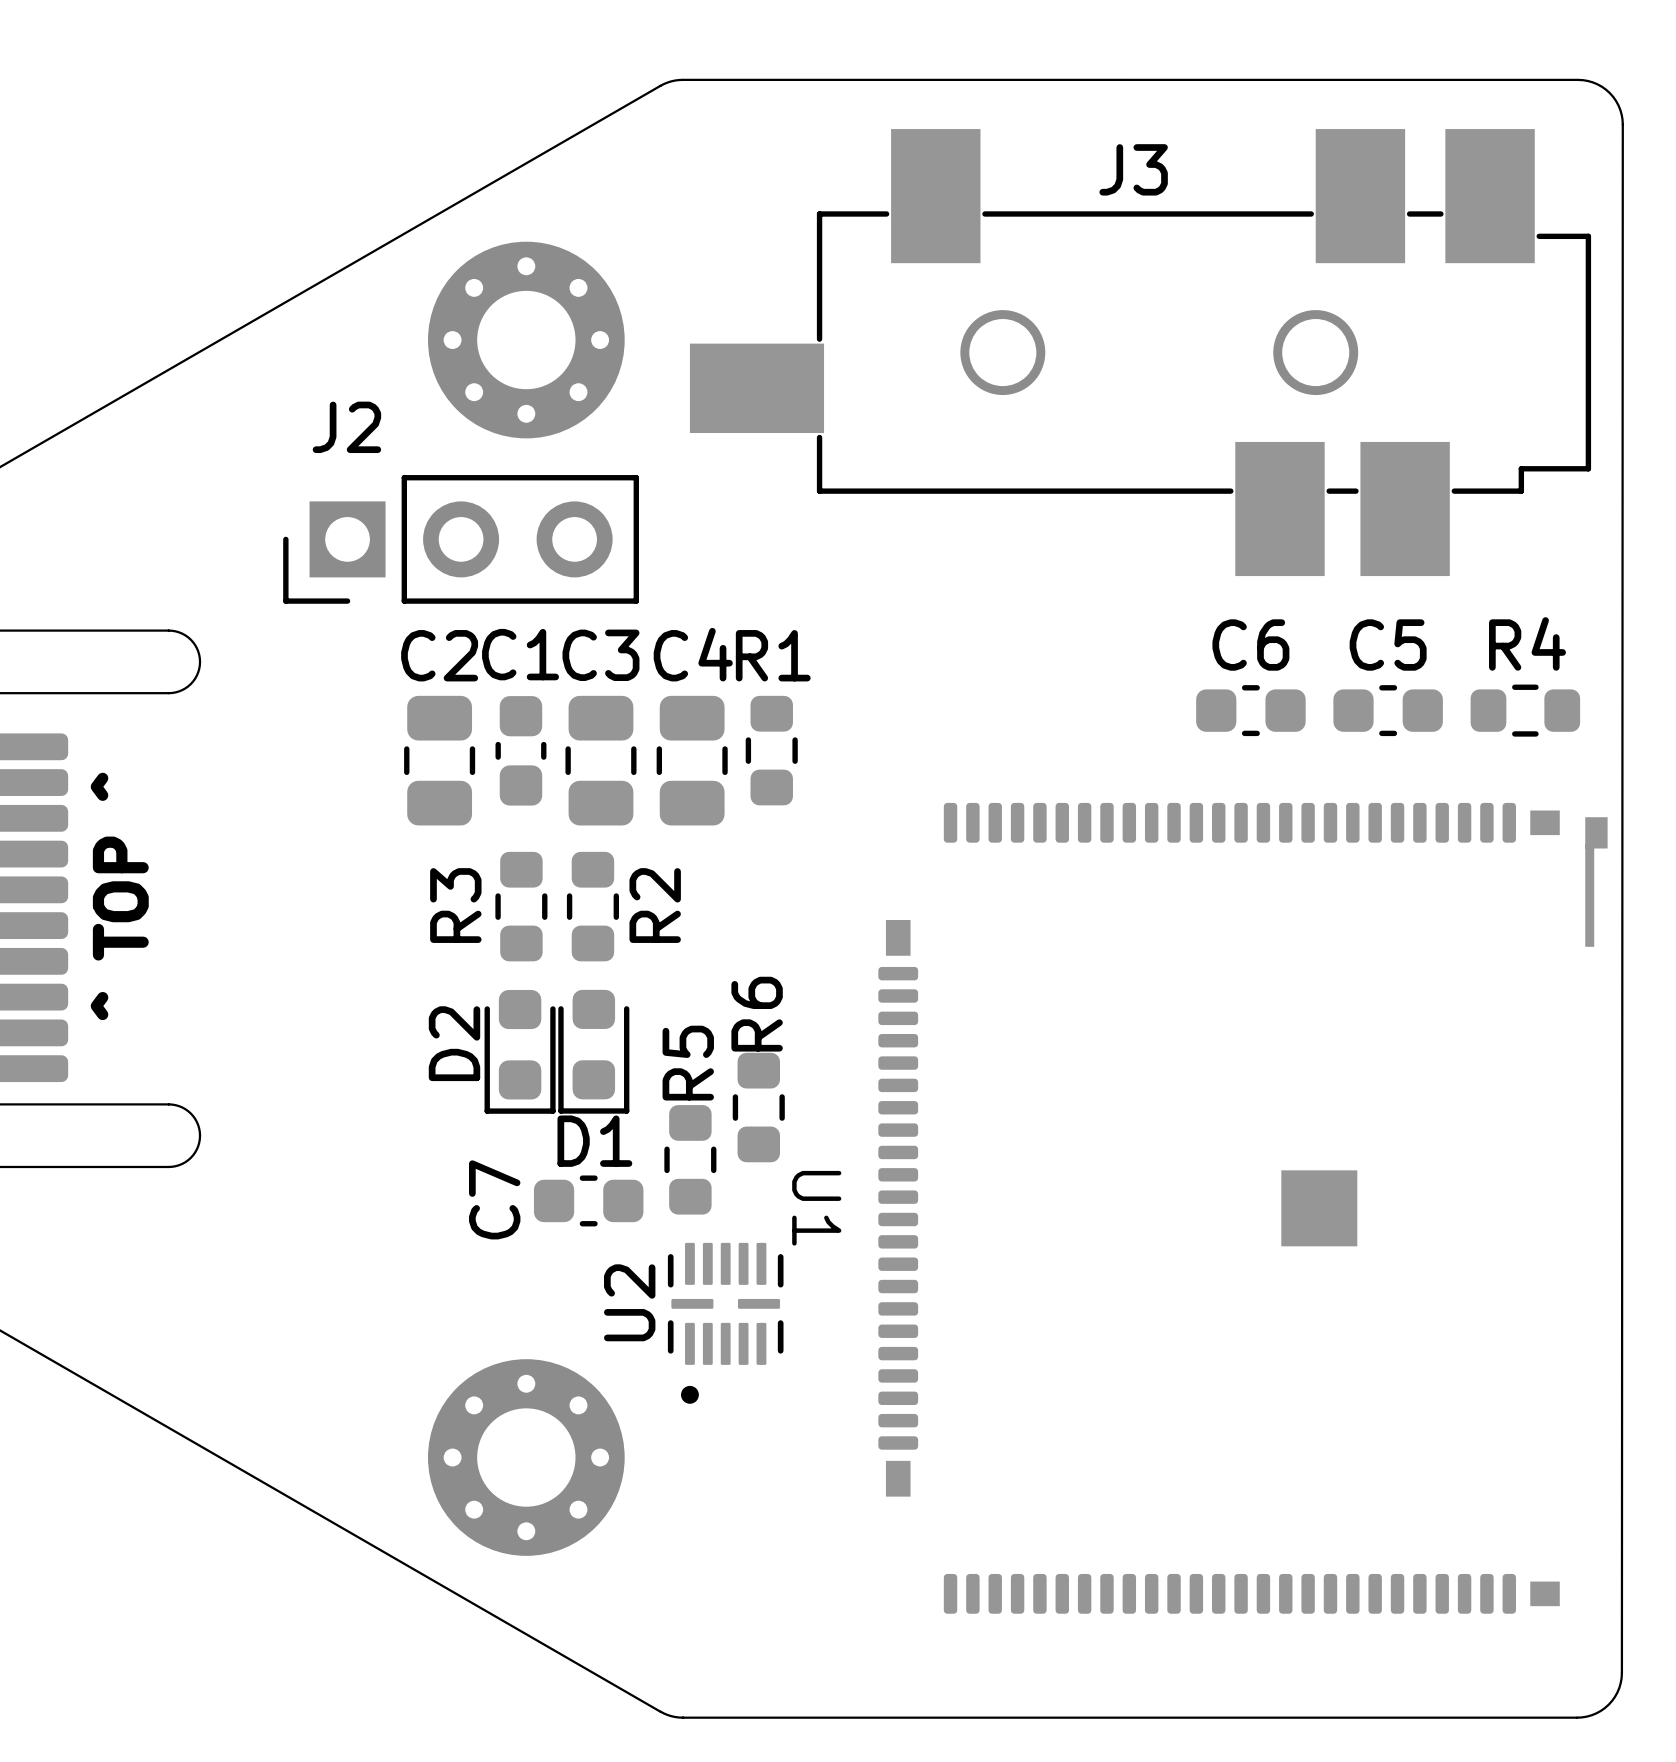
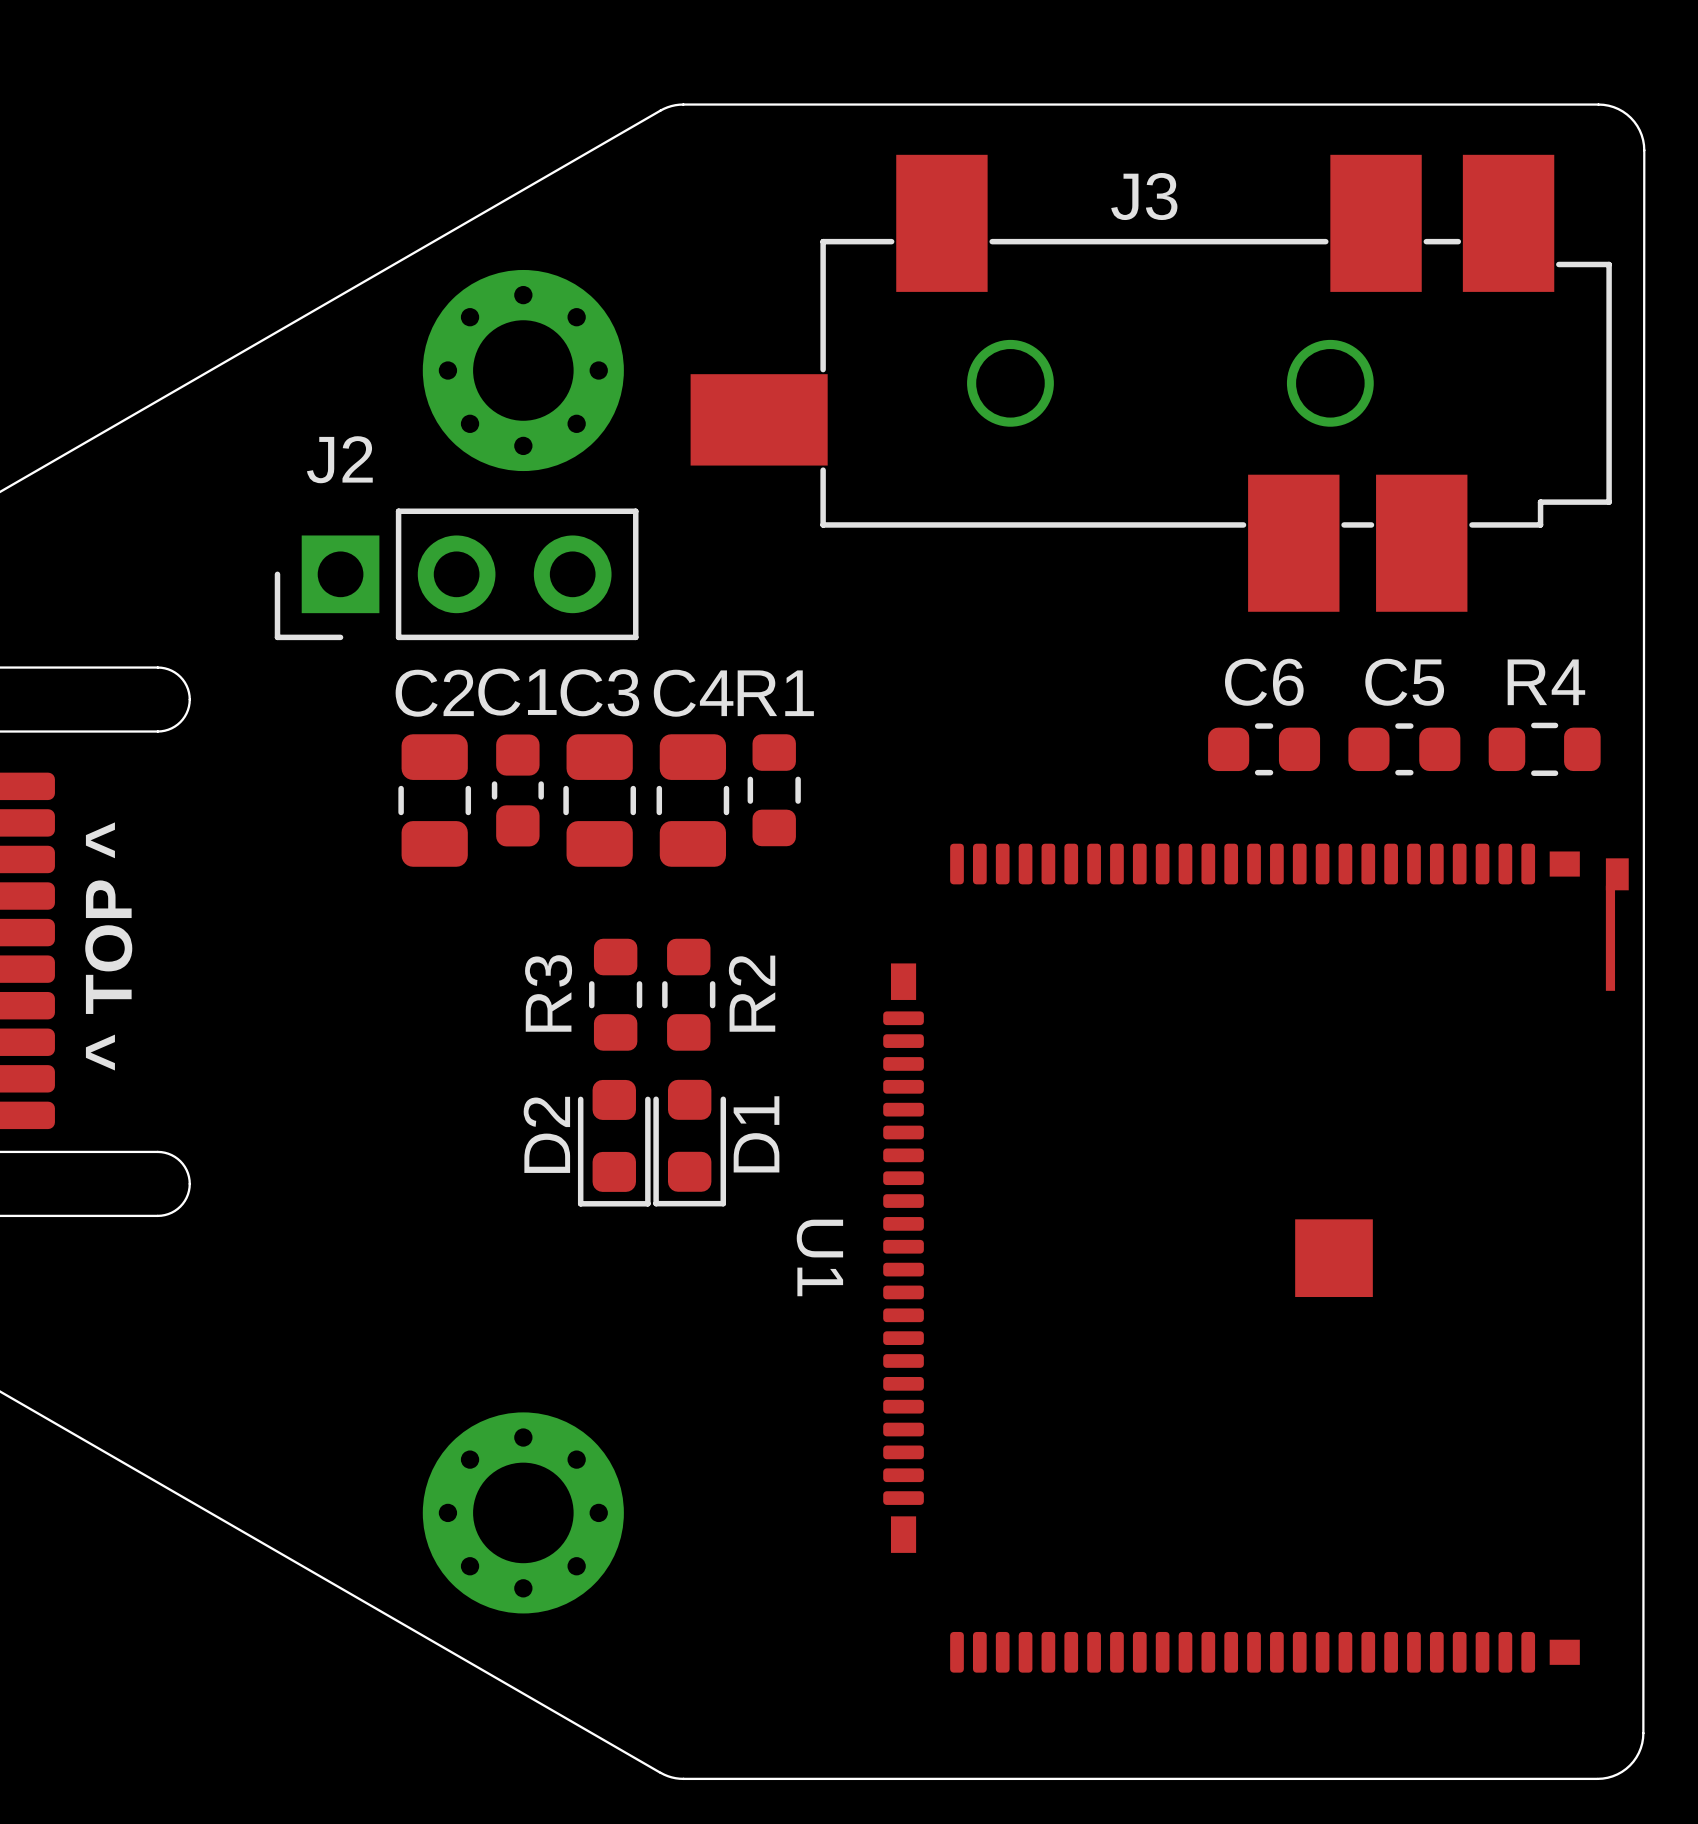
R3 position: (521, 906) -> (615, 994)
R2 position: (592, 906) -> (688, 994)
D2 position: (520, 1051) -> (614, 1143)
D1 position: (593, 1051) -> (689, 1143)
R6: (758, 1107) -> none
D1 name rotation: 0° (594, 1141) -> 90° counterclockwise (756, 1134)
D1 name position: D1 (594, 1141) -> D1 (756, 1134)
R5: (690, 1159) -> none
C7: (588, 1200) -> none
U2: (725, 1323) -> none

